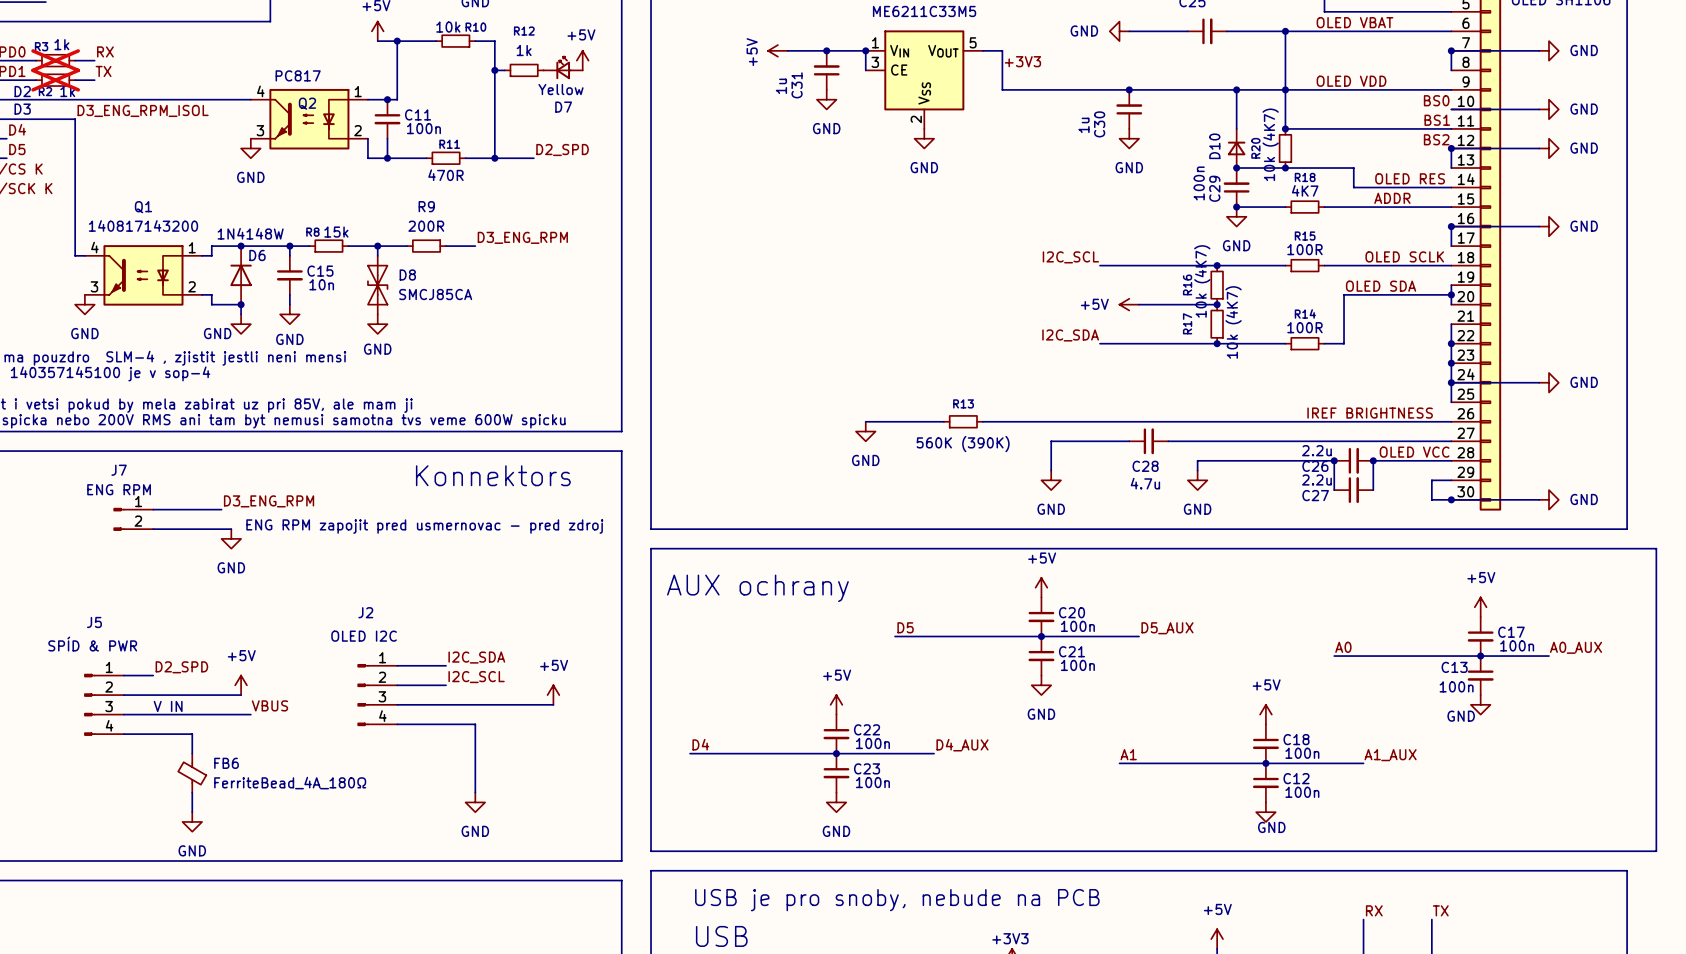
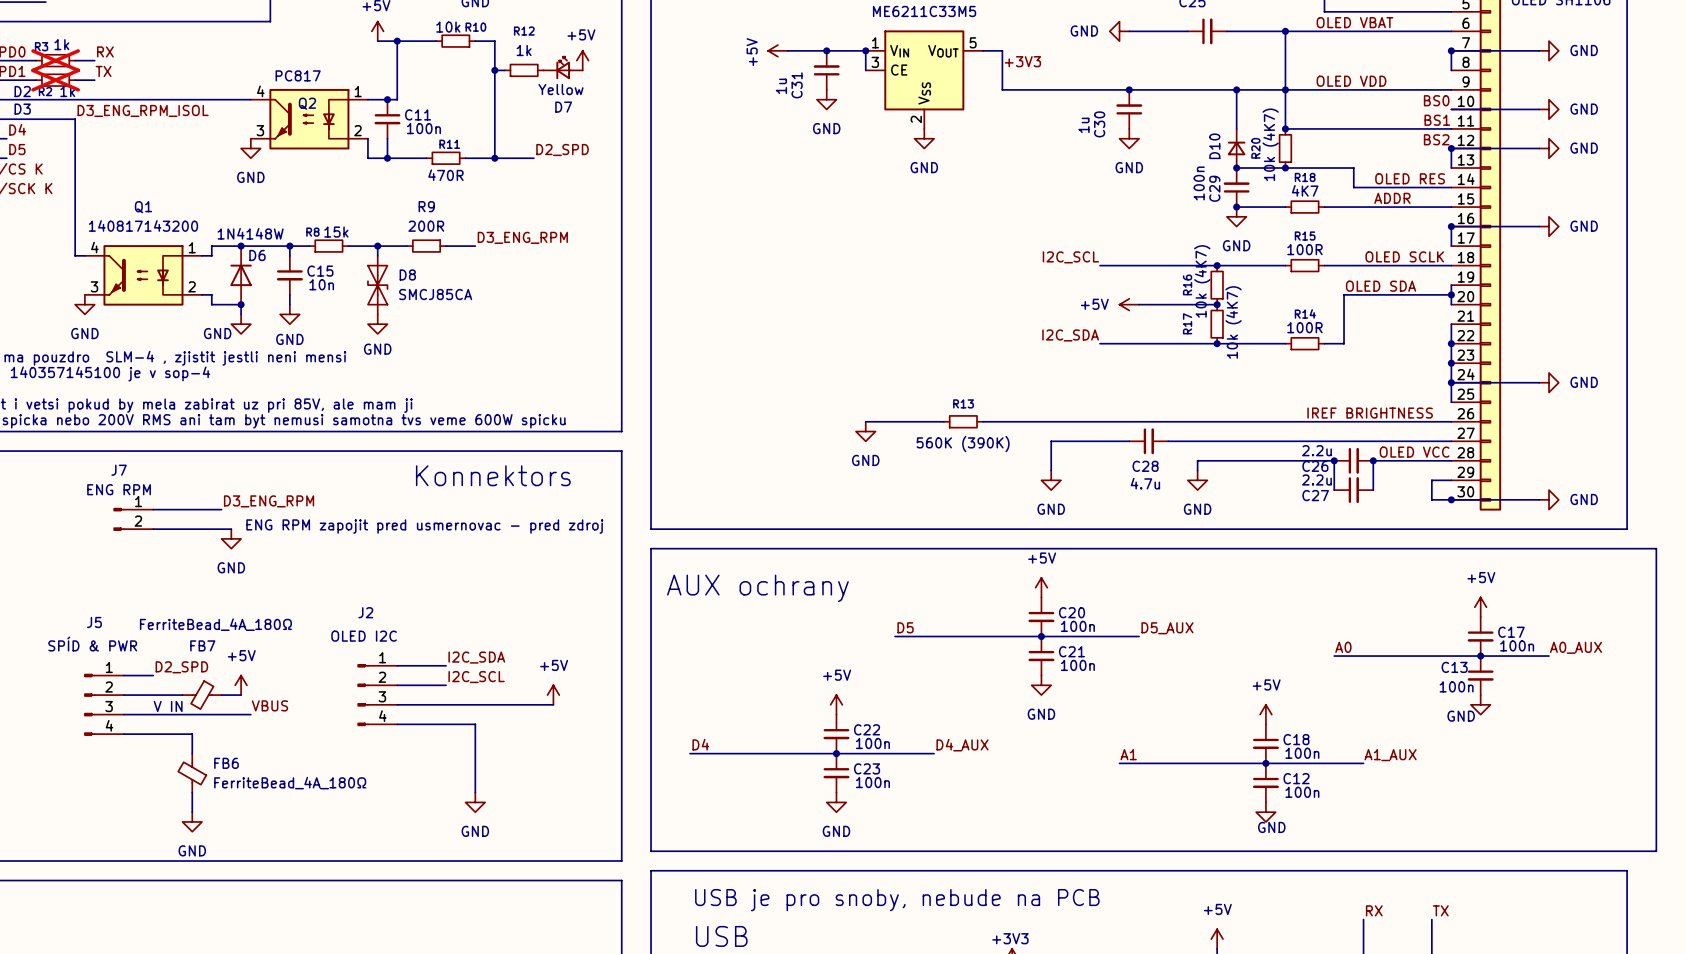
FB7: none -> FerriteBead_4A_180Ω (202, 695)

